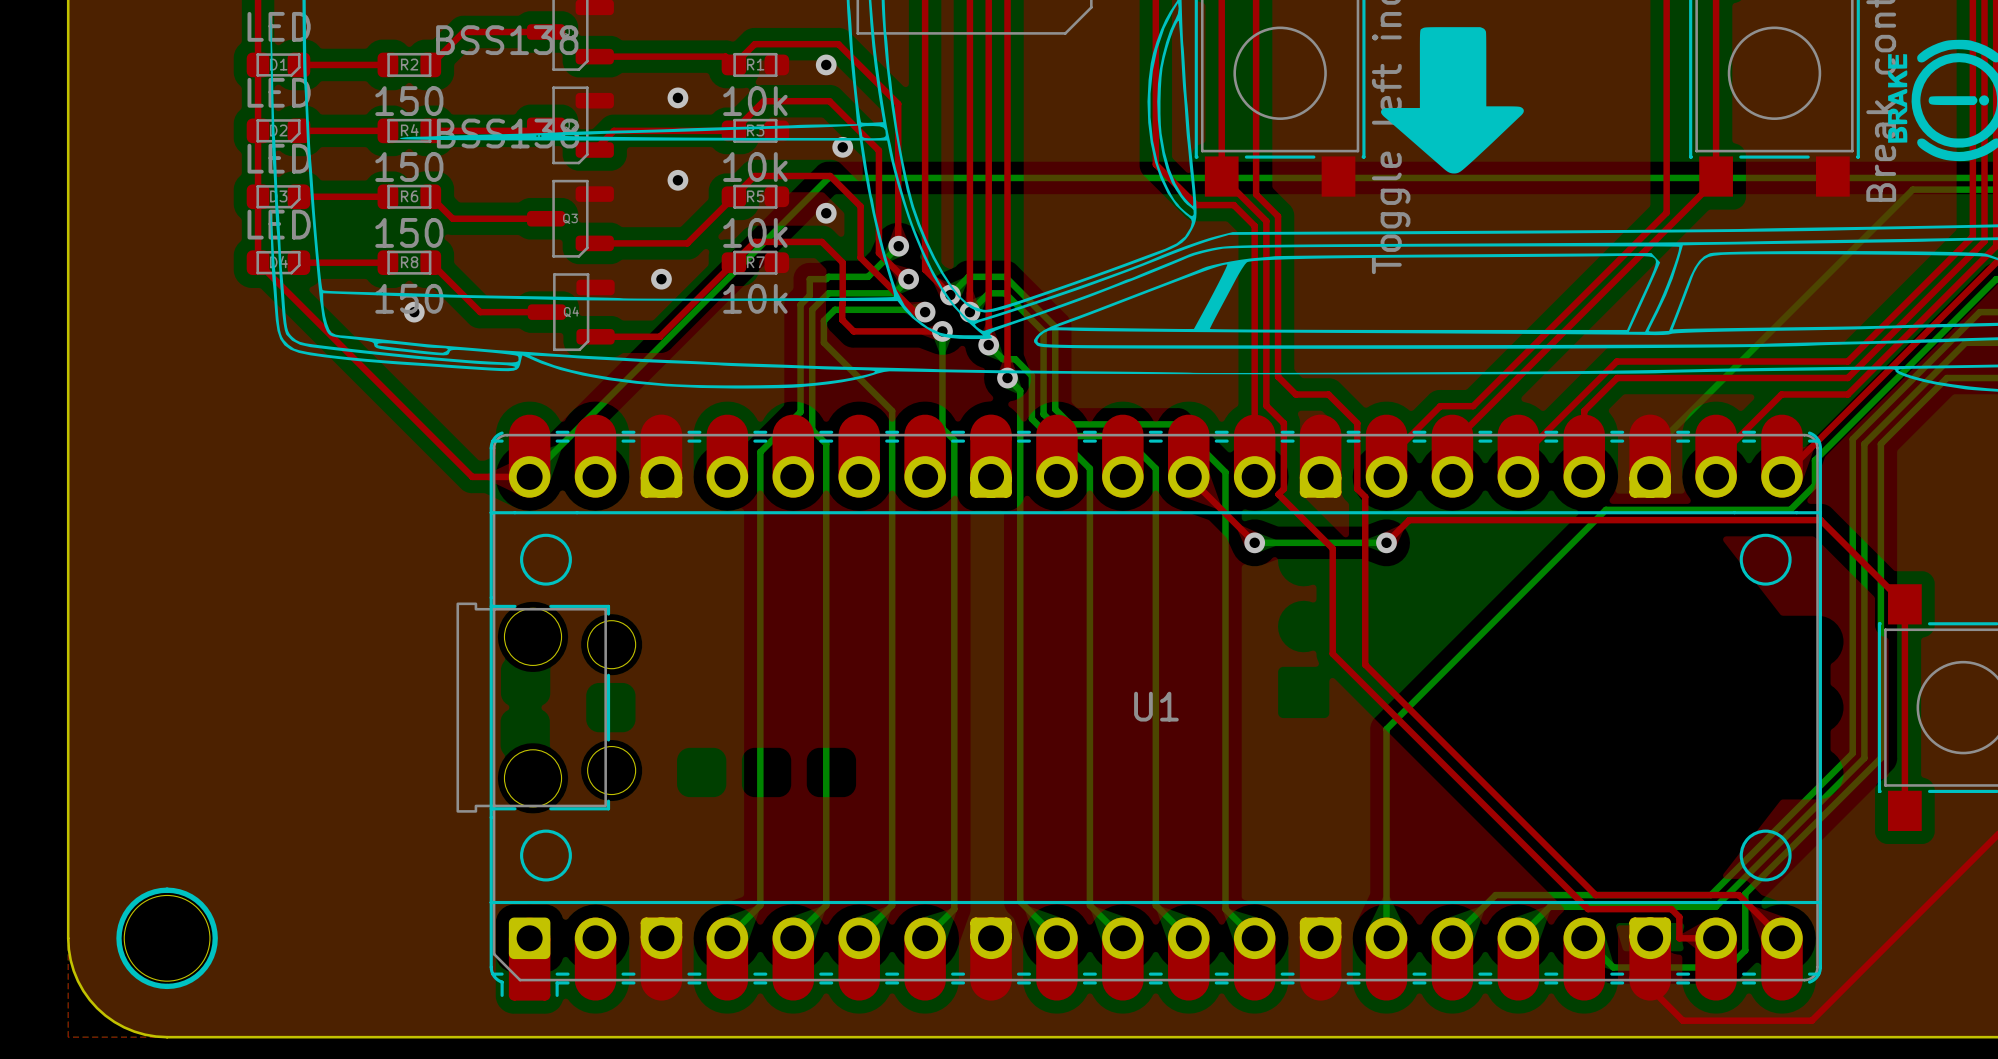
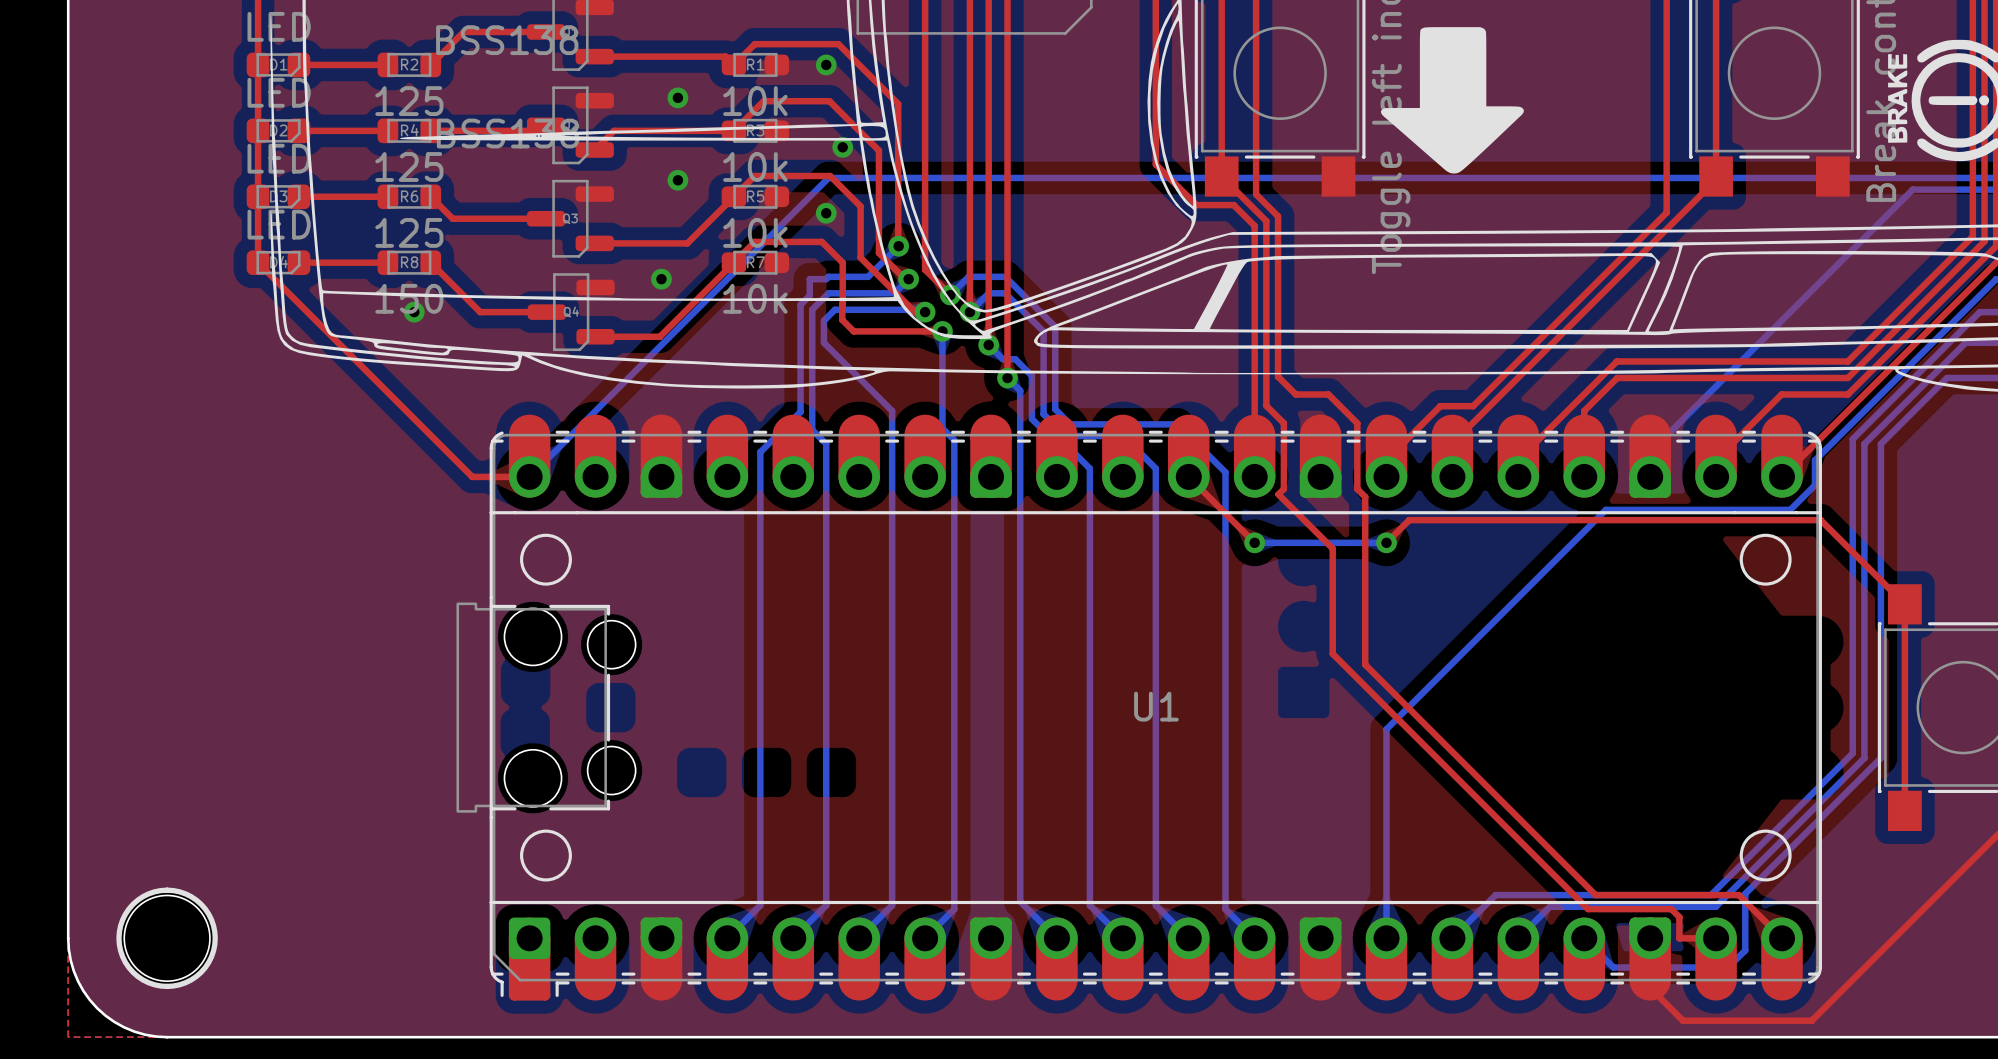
R2 value: 150 (409, 101) -> 125 (409, 101)
R4 value: 150 (409, 166) -> 125 (409, 166)
R6 value: 150 (409, 232) -> 125 (409, 232)

